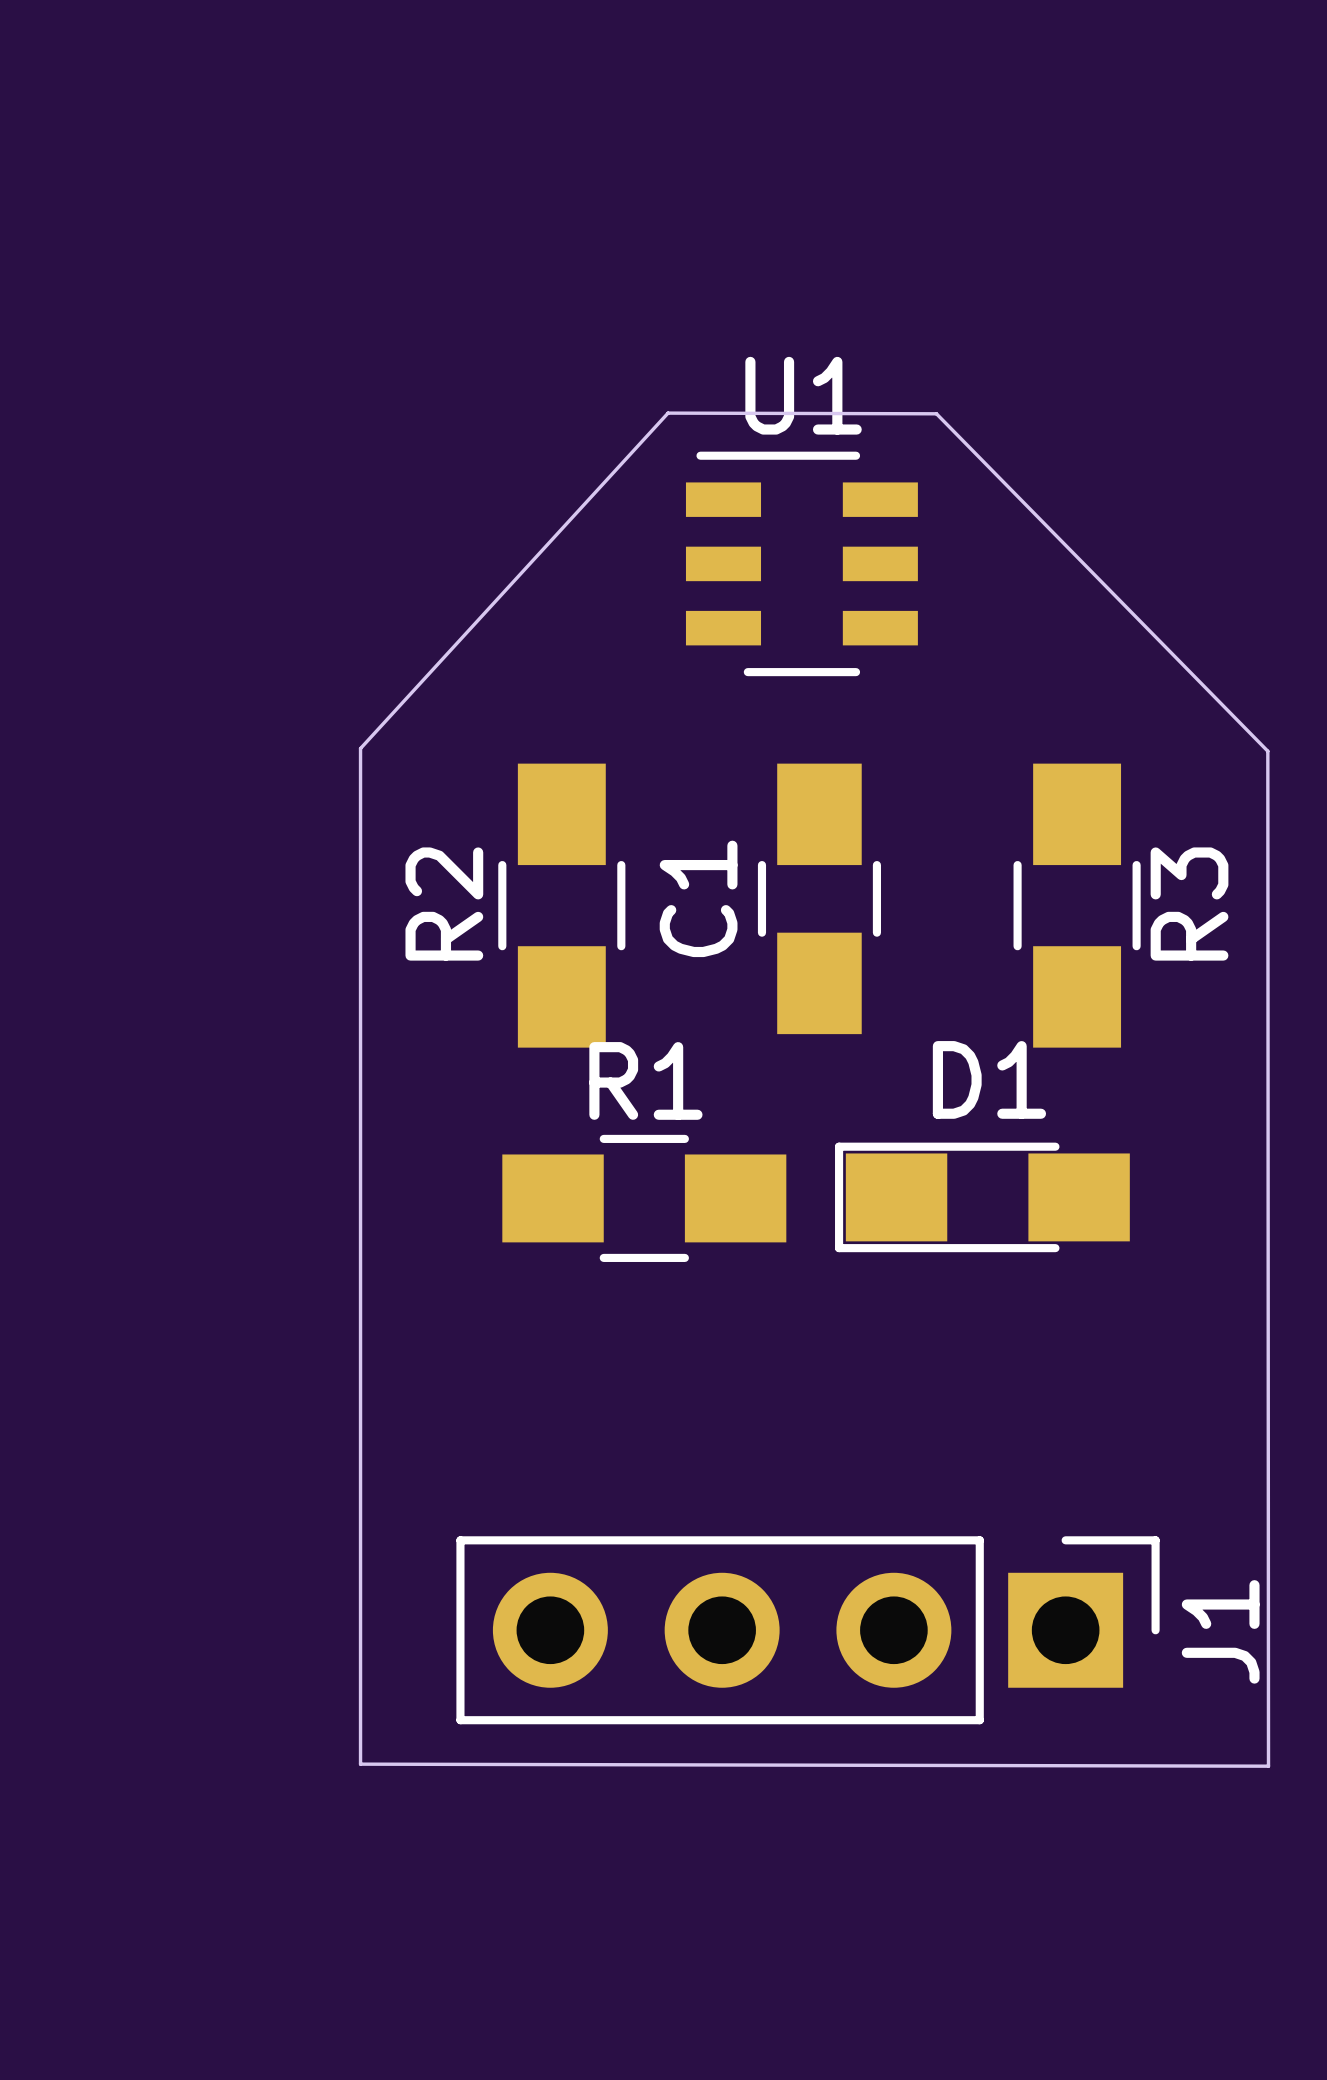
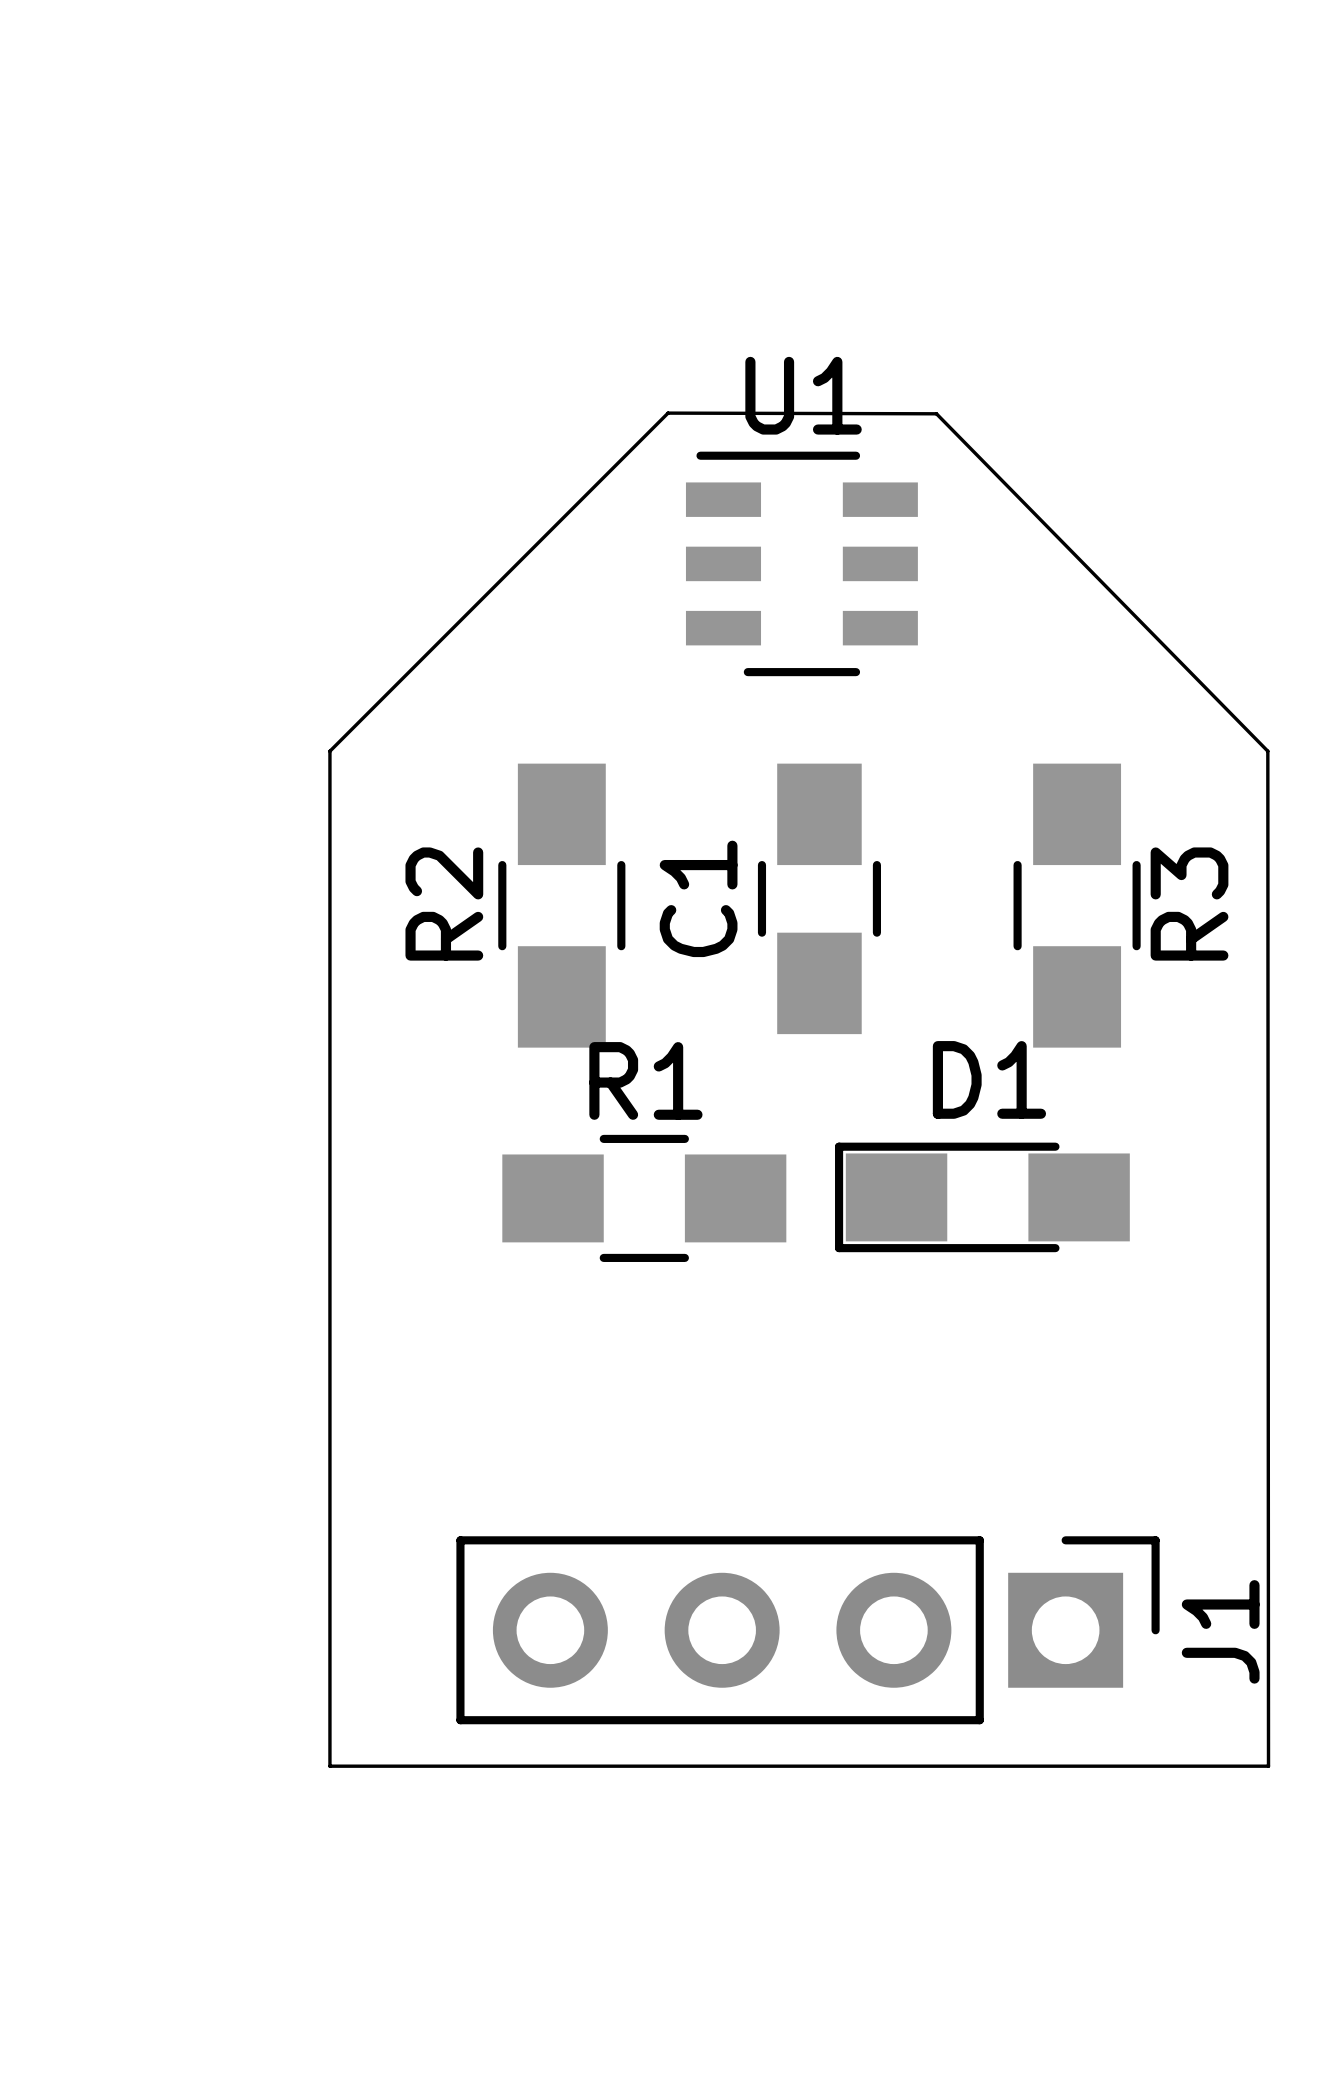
board edge: (668, 413) (360, 748) (360, 1764) (1268, 1766) -> (668, 413) (329, 751) (329, 1766) (1268, 1766)

